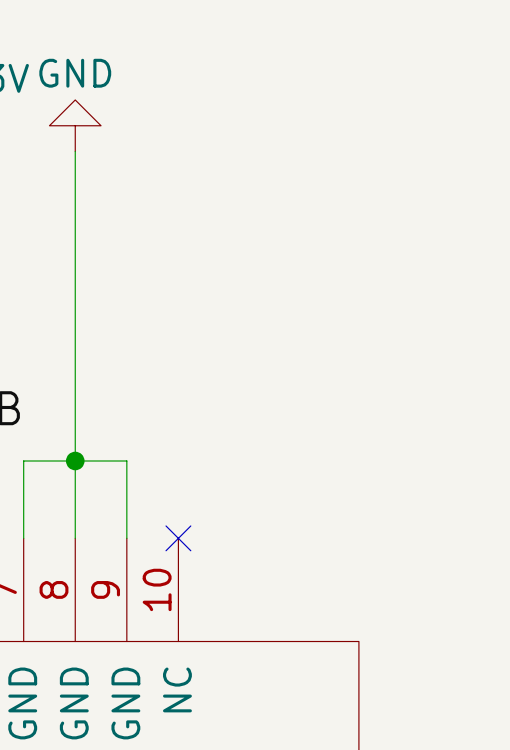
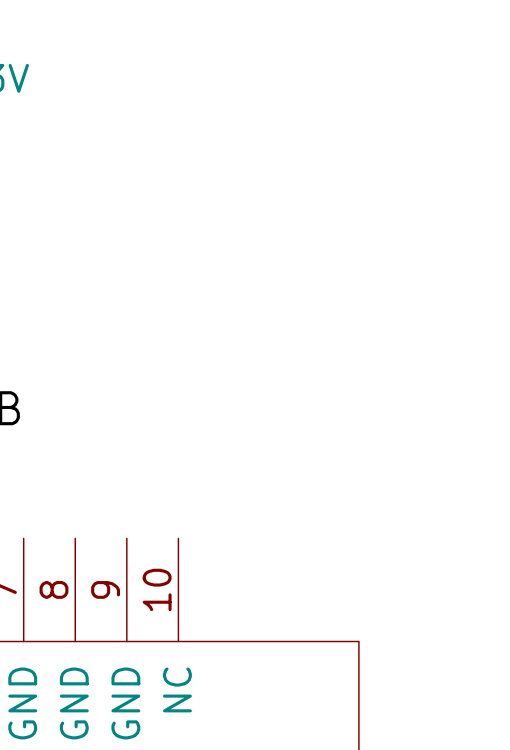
power symbol: GND (75, 125) -> none
wire: (75, 151) (75, 538) -> none
junction: (75, 460) -> none
wire: (23, 538) (23, 460) (126, 460) (126, 538) -> none
no-connect mark: (178, 538) -> none

